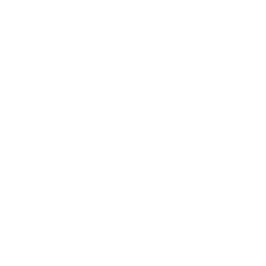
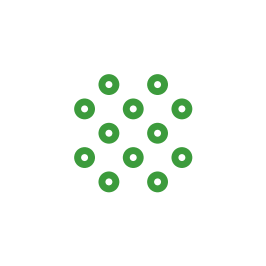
part: none -> (133, 133)

